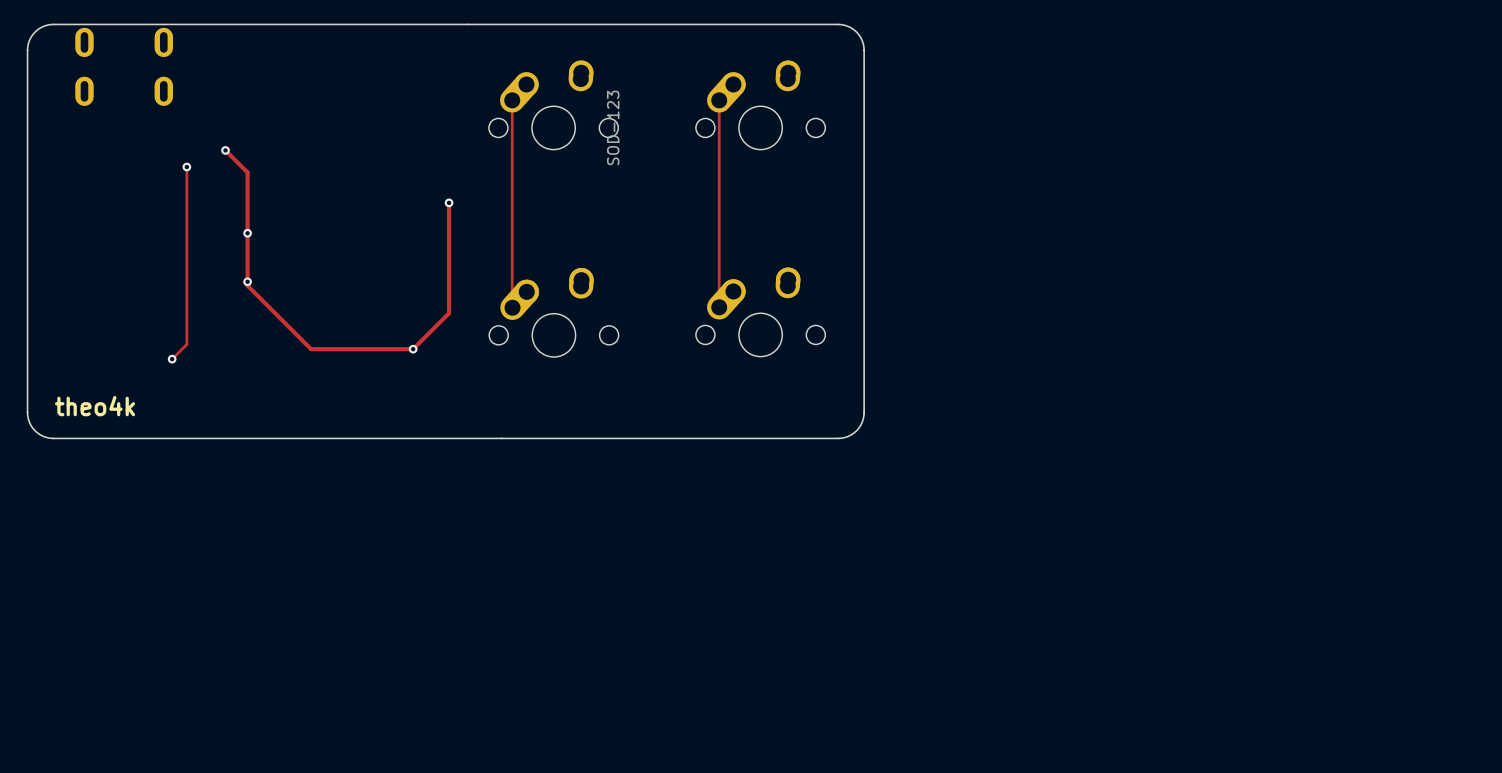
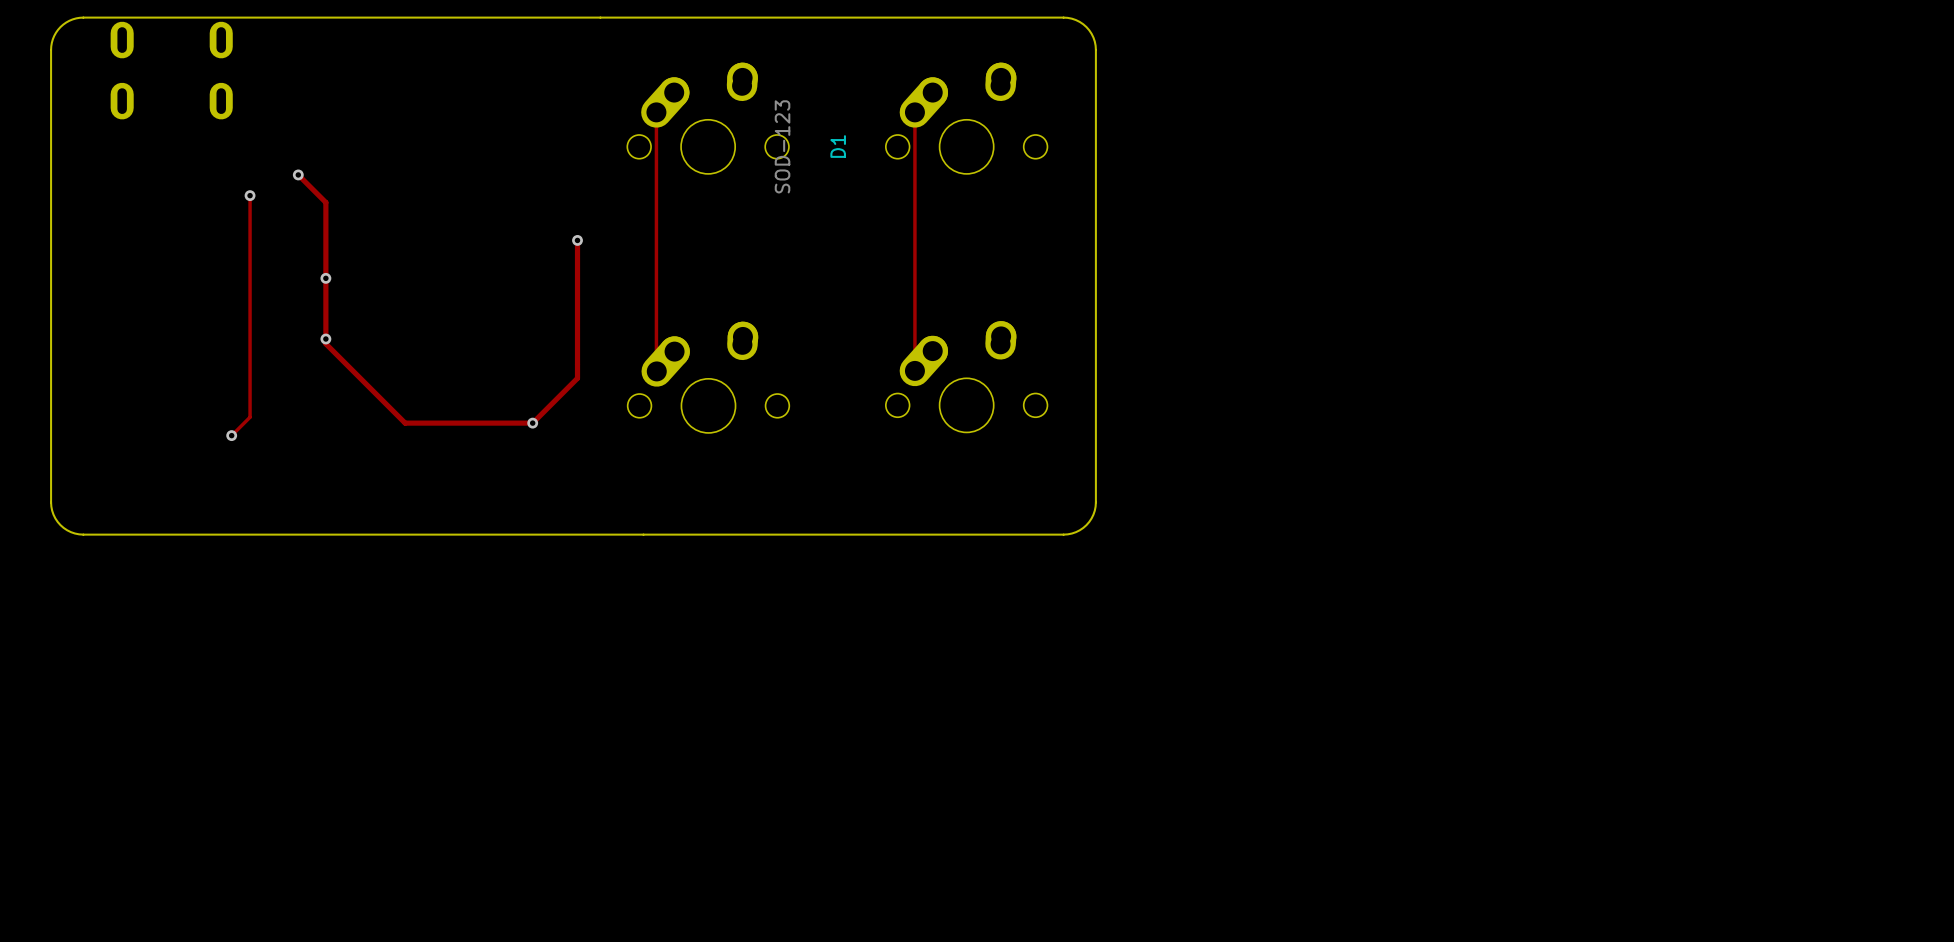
D1: none -> SOD-123 (810, 146)
text: theo4k (95, 406) -> none

